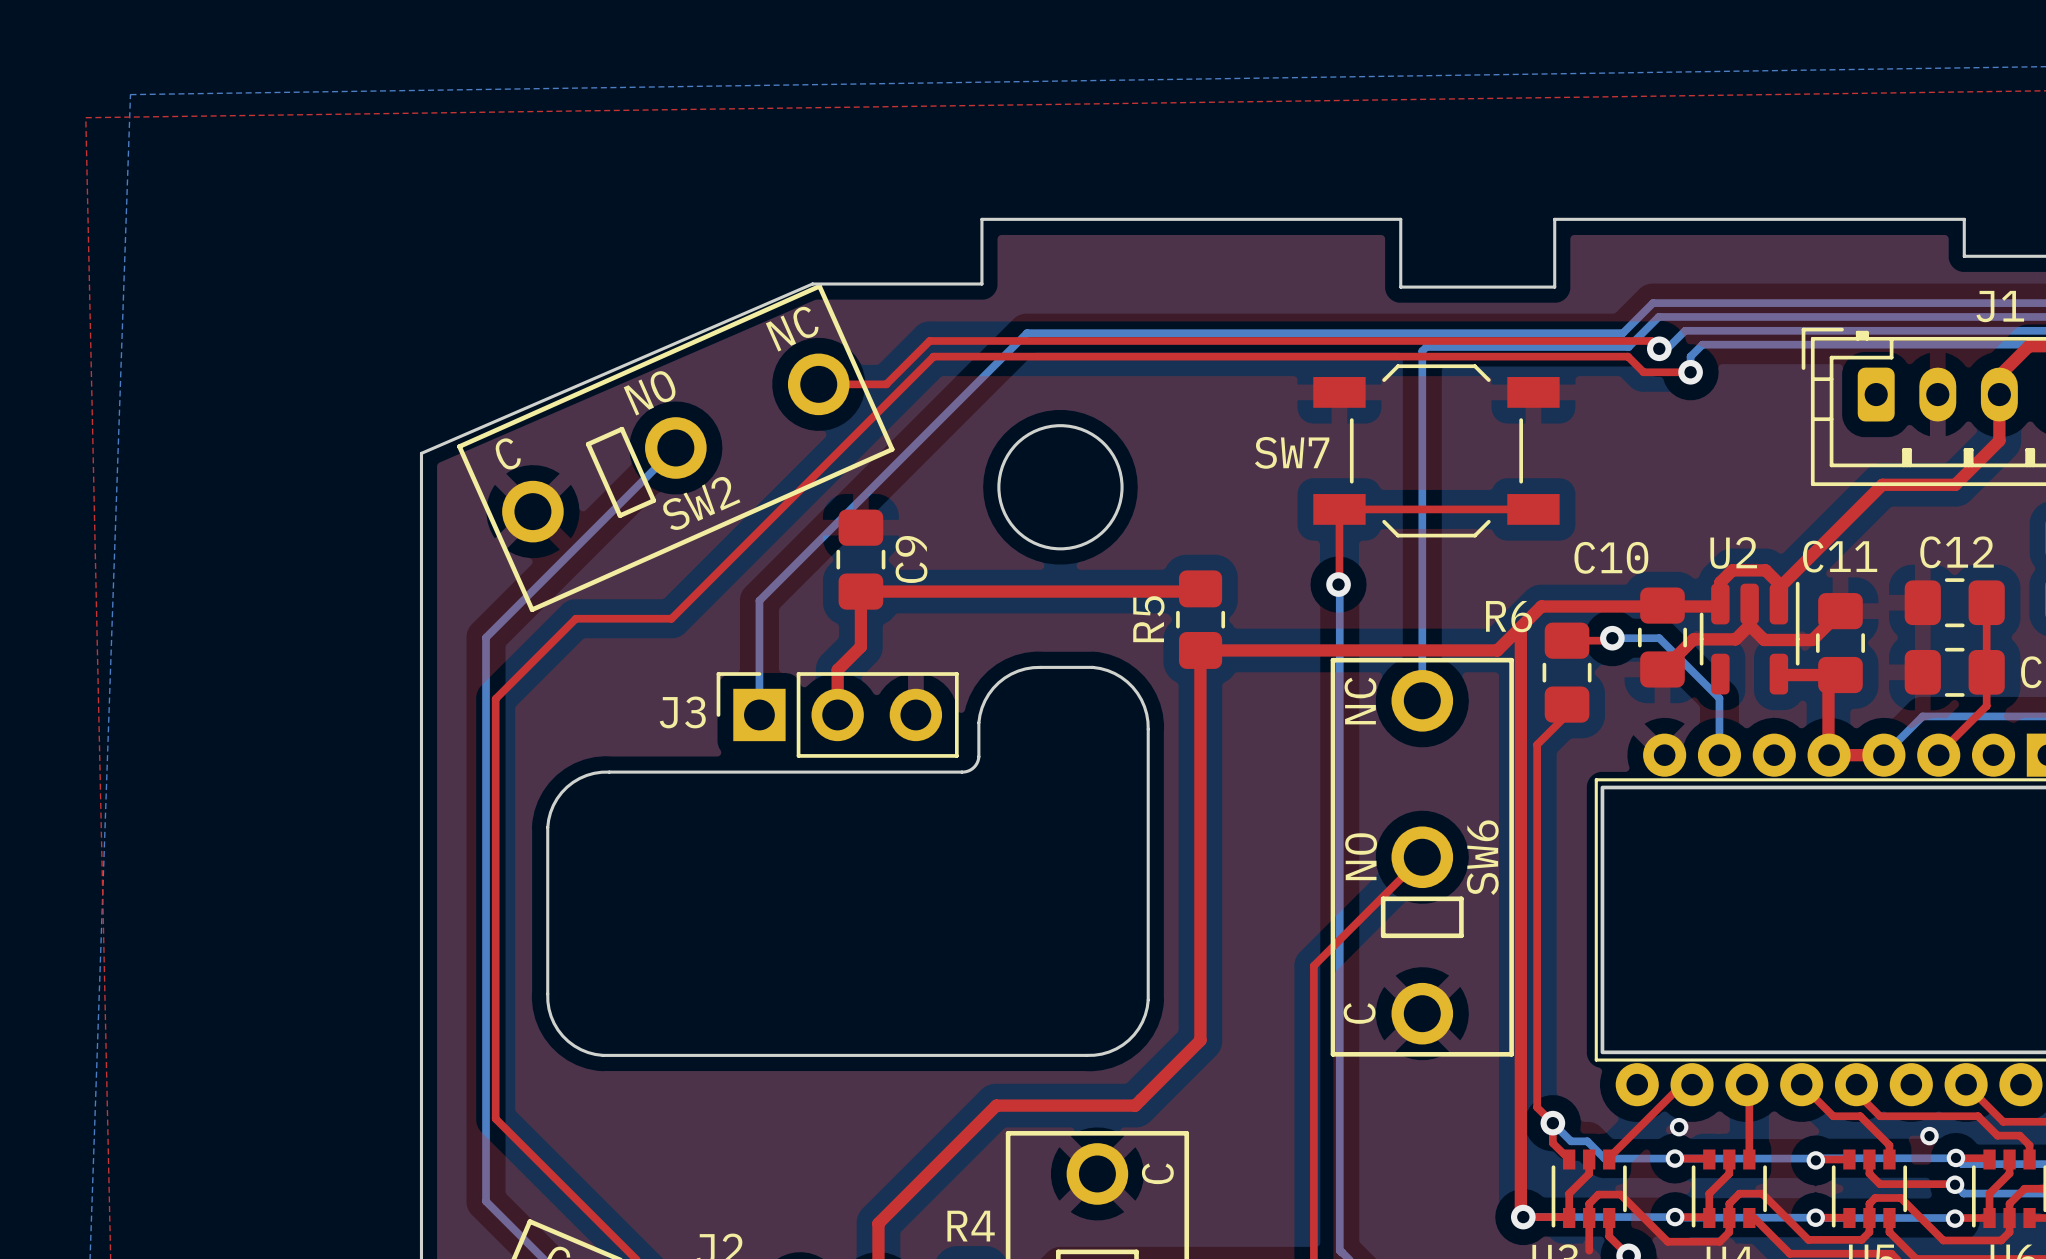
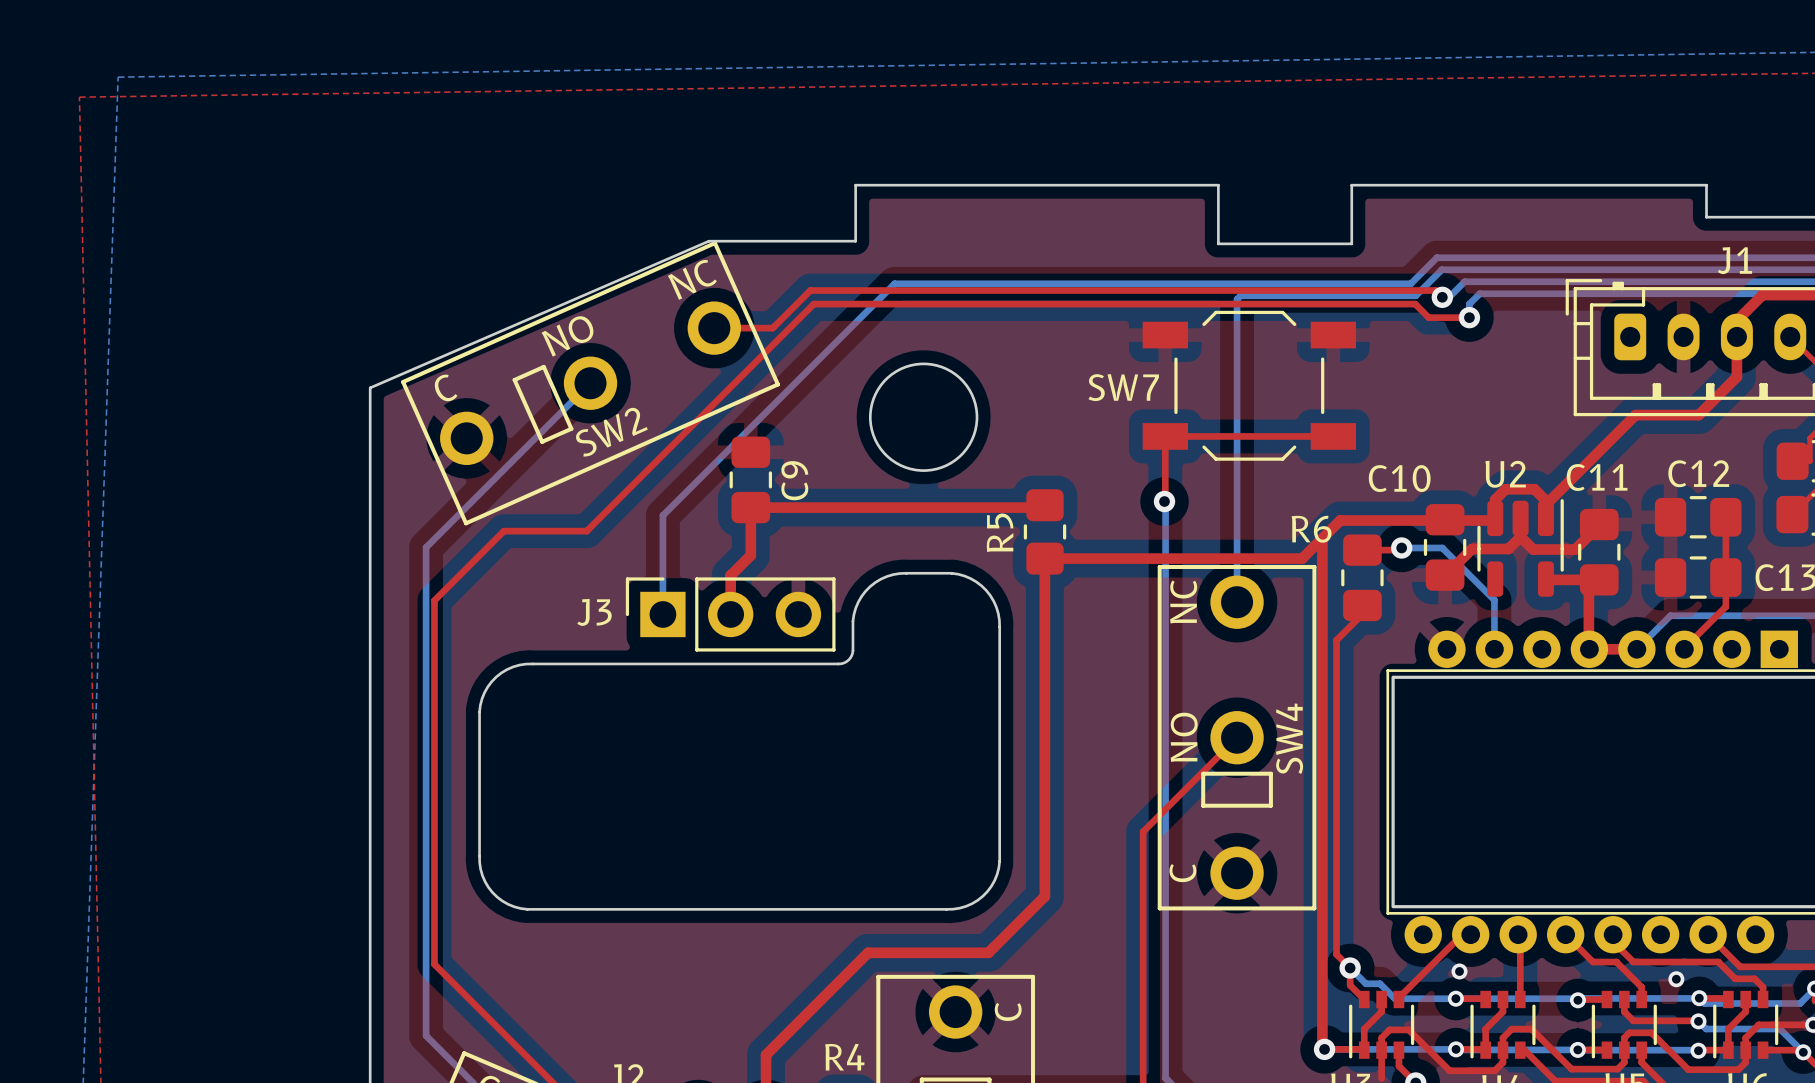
SW6 name: SW6 (1482, 857) -> SW4 (1289, 738)

